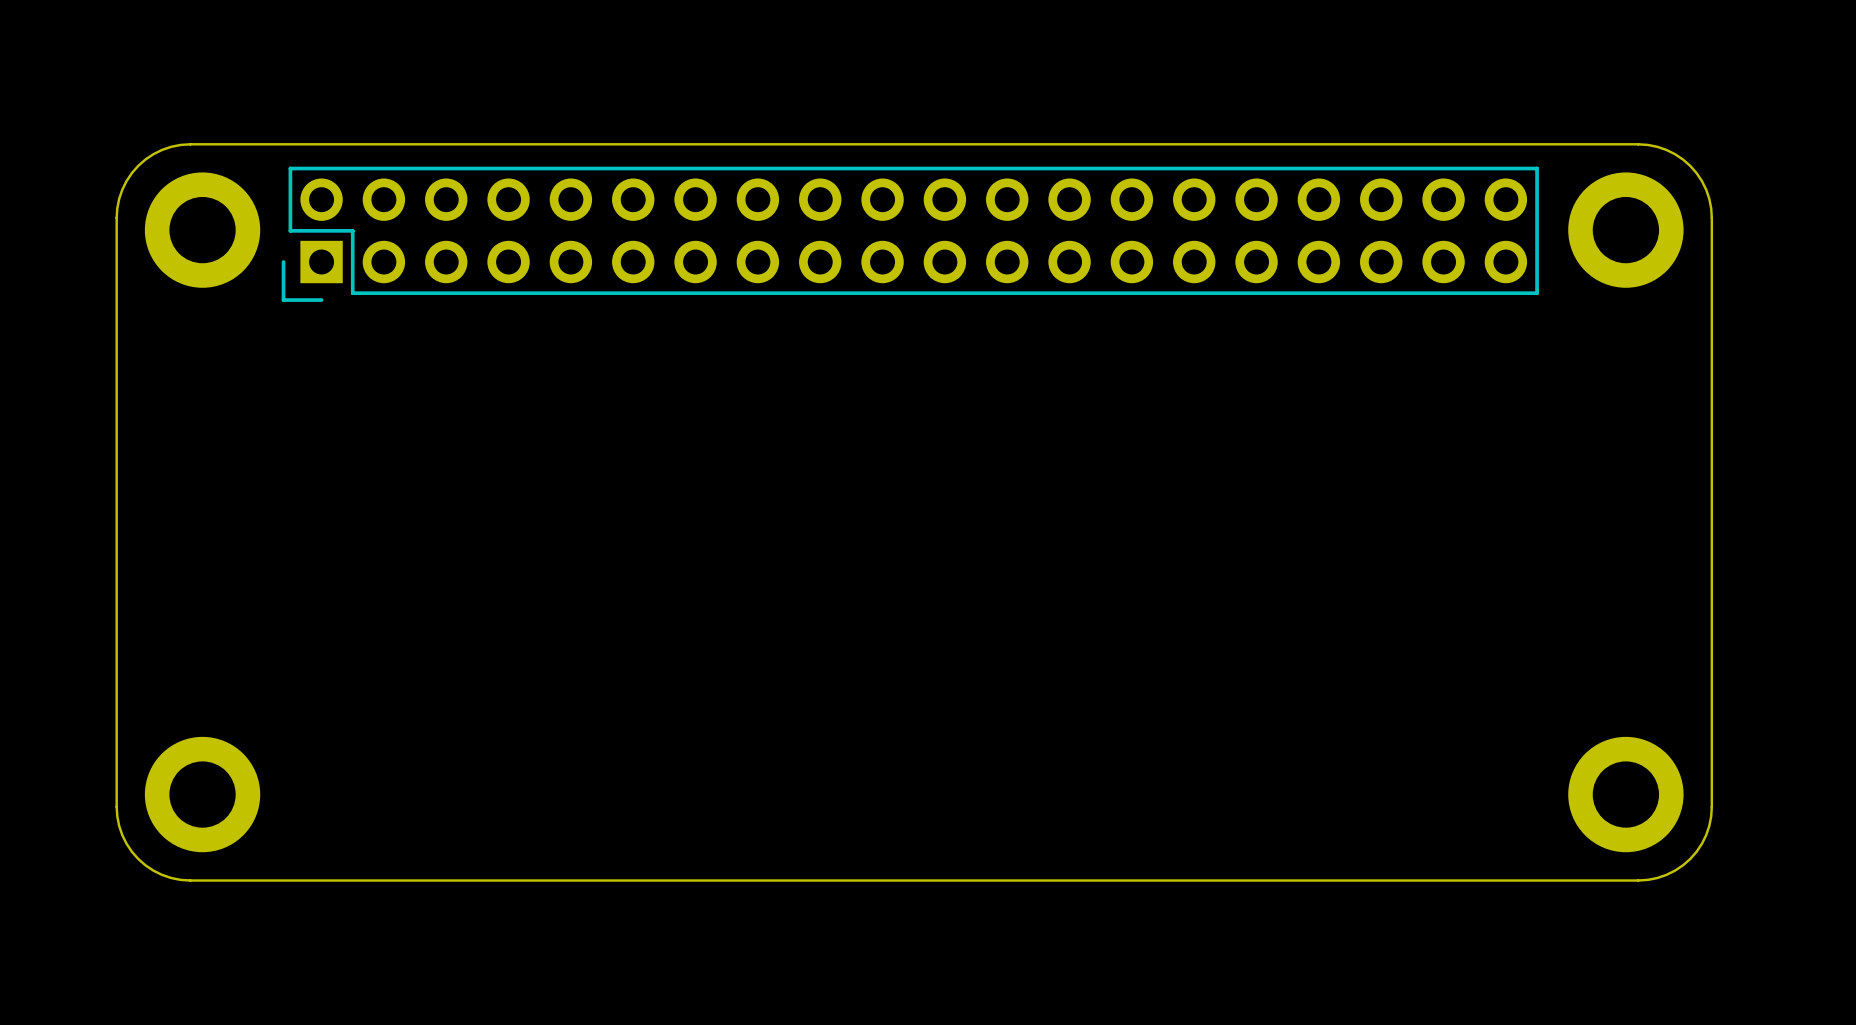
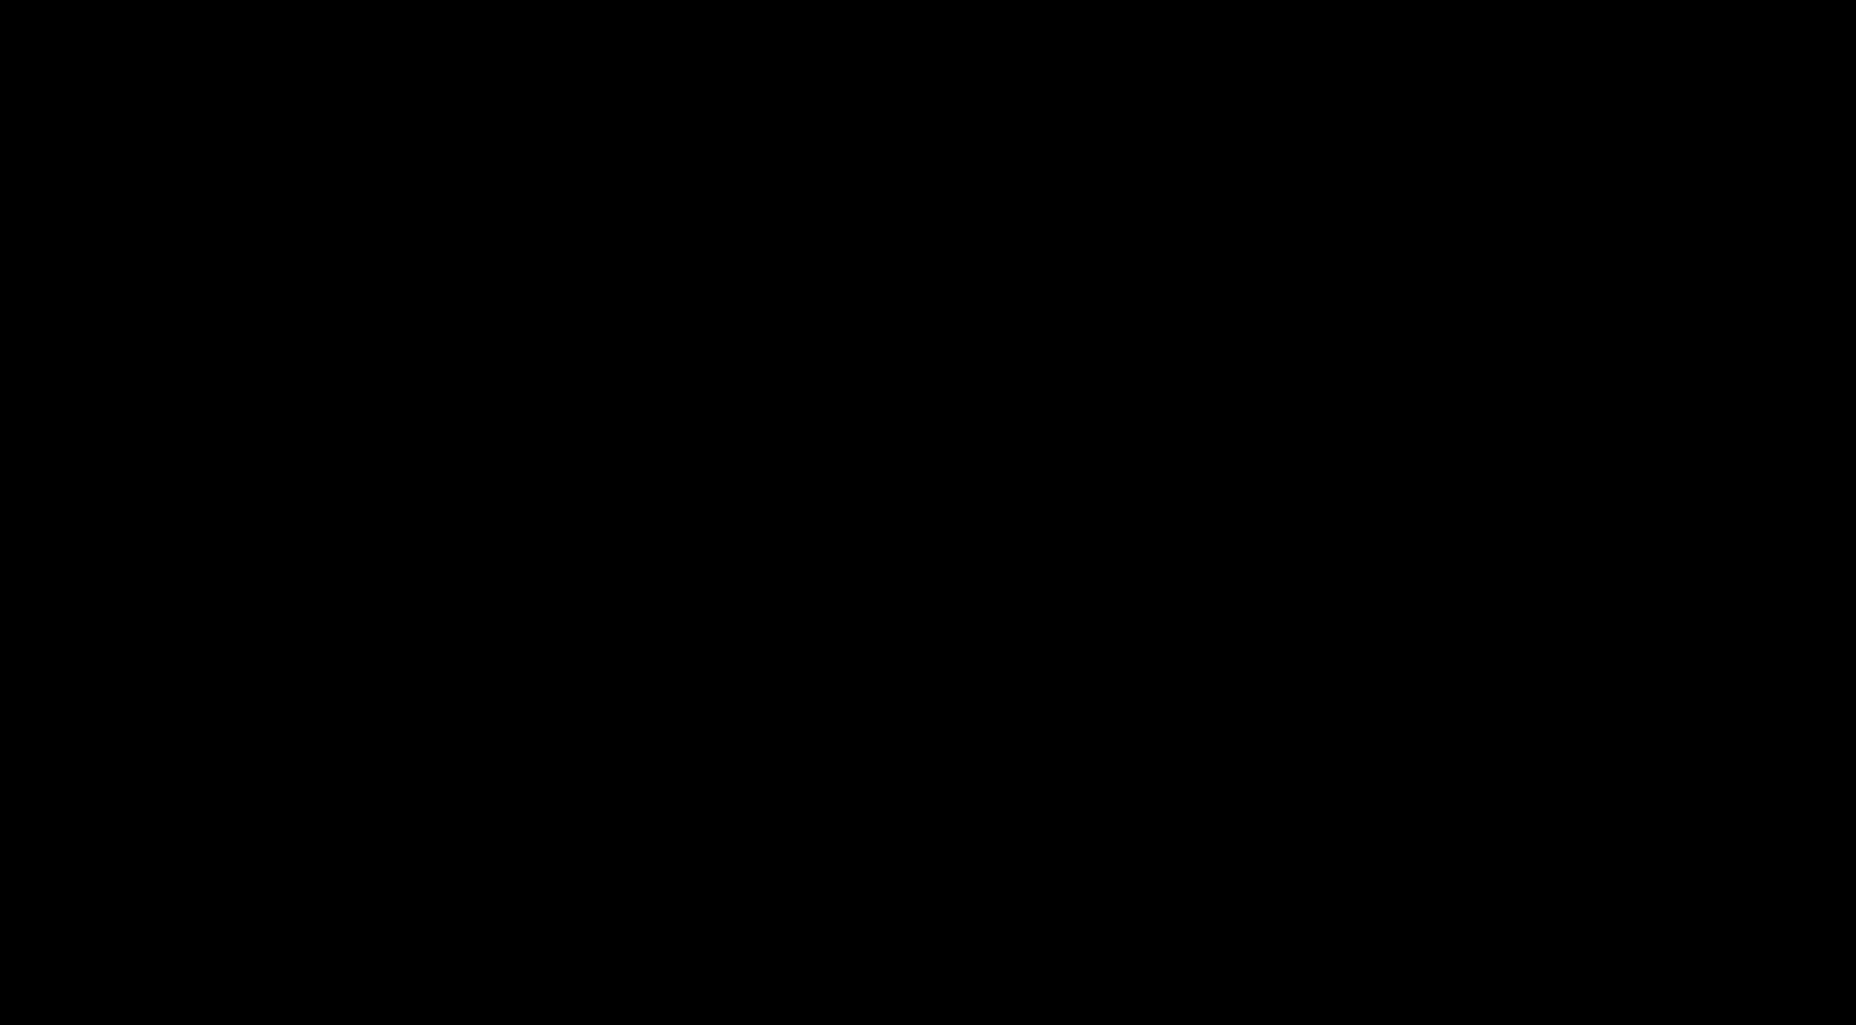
board edge: (190, 144) (1638, 144) (1666, 149) (1683, 159) (1696, 173) (1706, 189) (1711, 217) (1711, 806) (1706, 835) (1696, 851) (1675, 870) (1657, 878) (1638, 880) (190, 880) (162, 874) (145, 865) (131, 851) (122, 835) (117, 816) (116, 217) (122, 189) (138, 165) (162, 149) (190, 144) -> none
part: (202, 230) -> none
part: (1625, 230) -> none
part: (910, 234) -> none
part: (202, 794) -> none
part: (1625, 794) -> none

